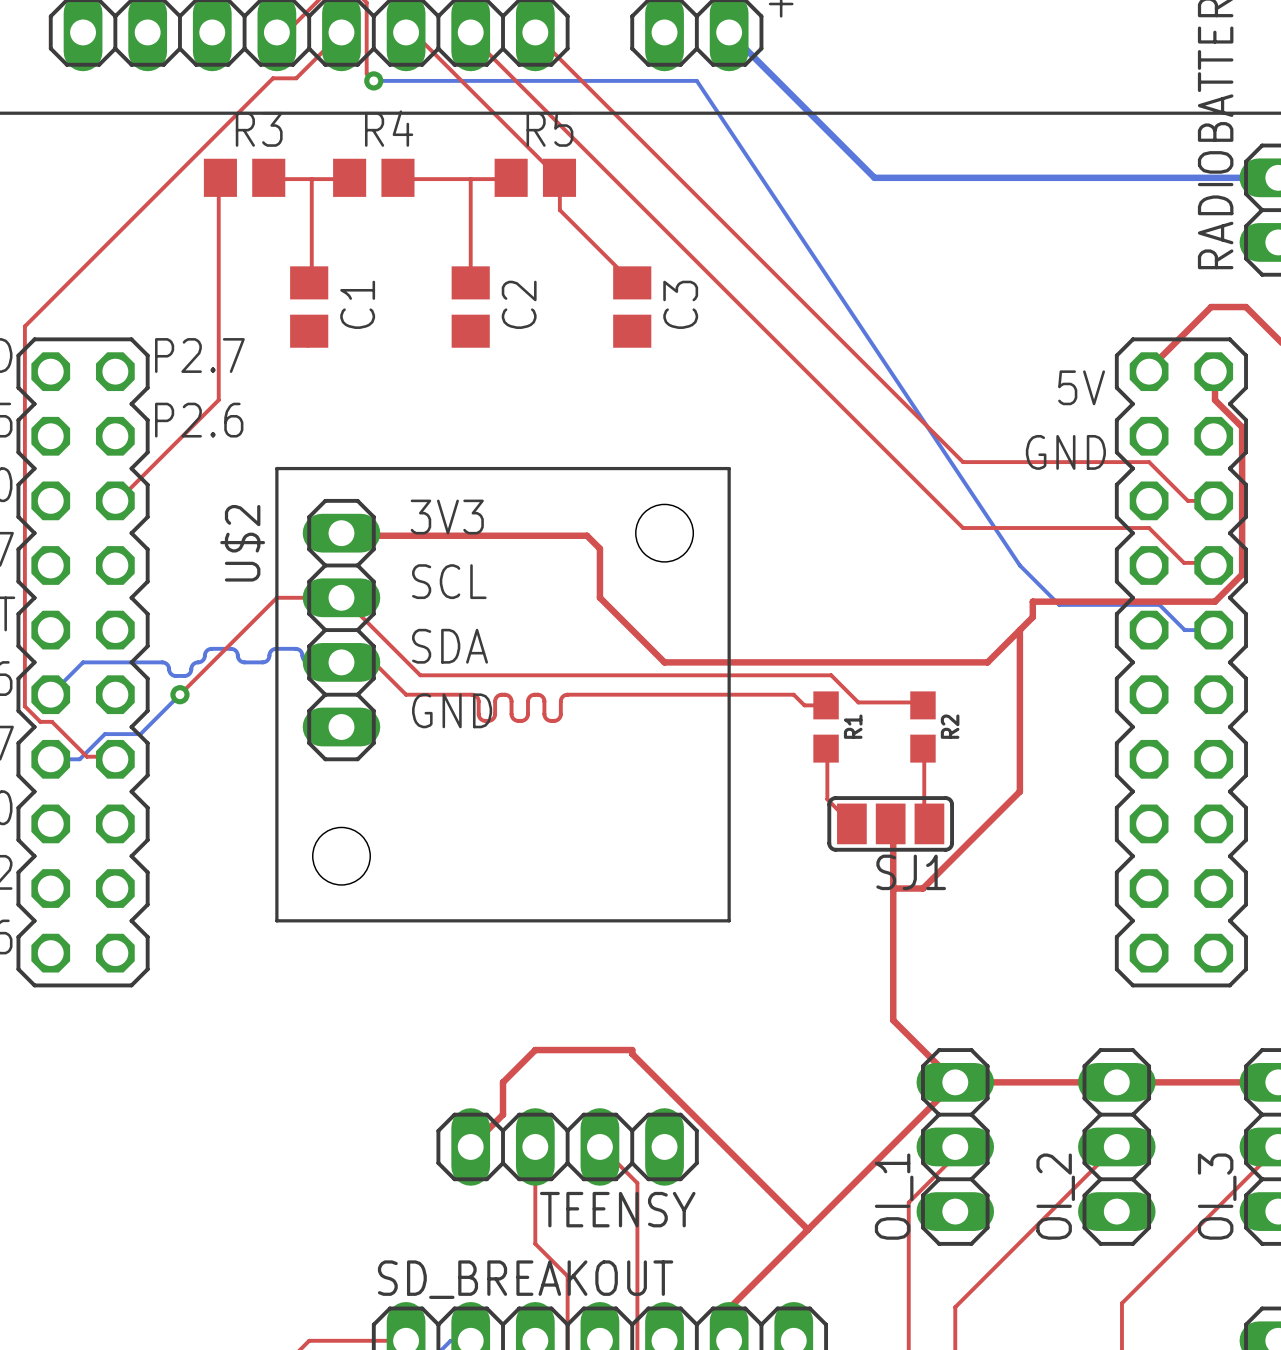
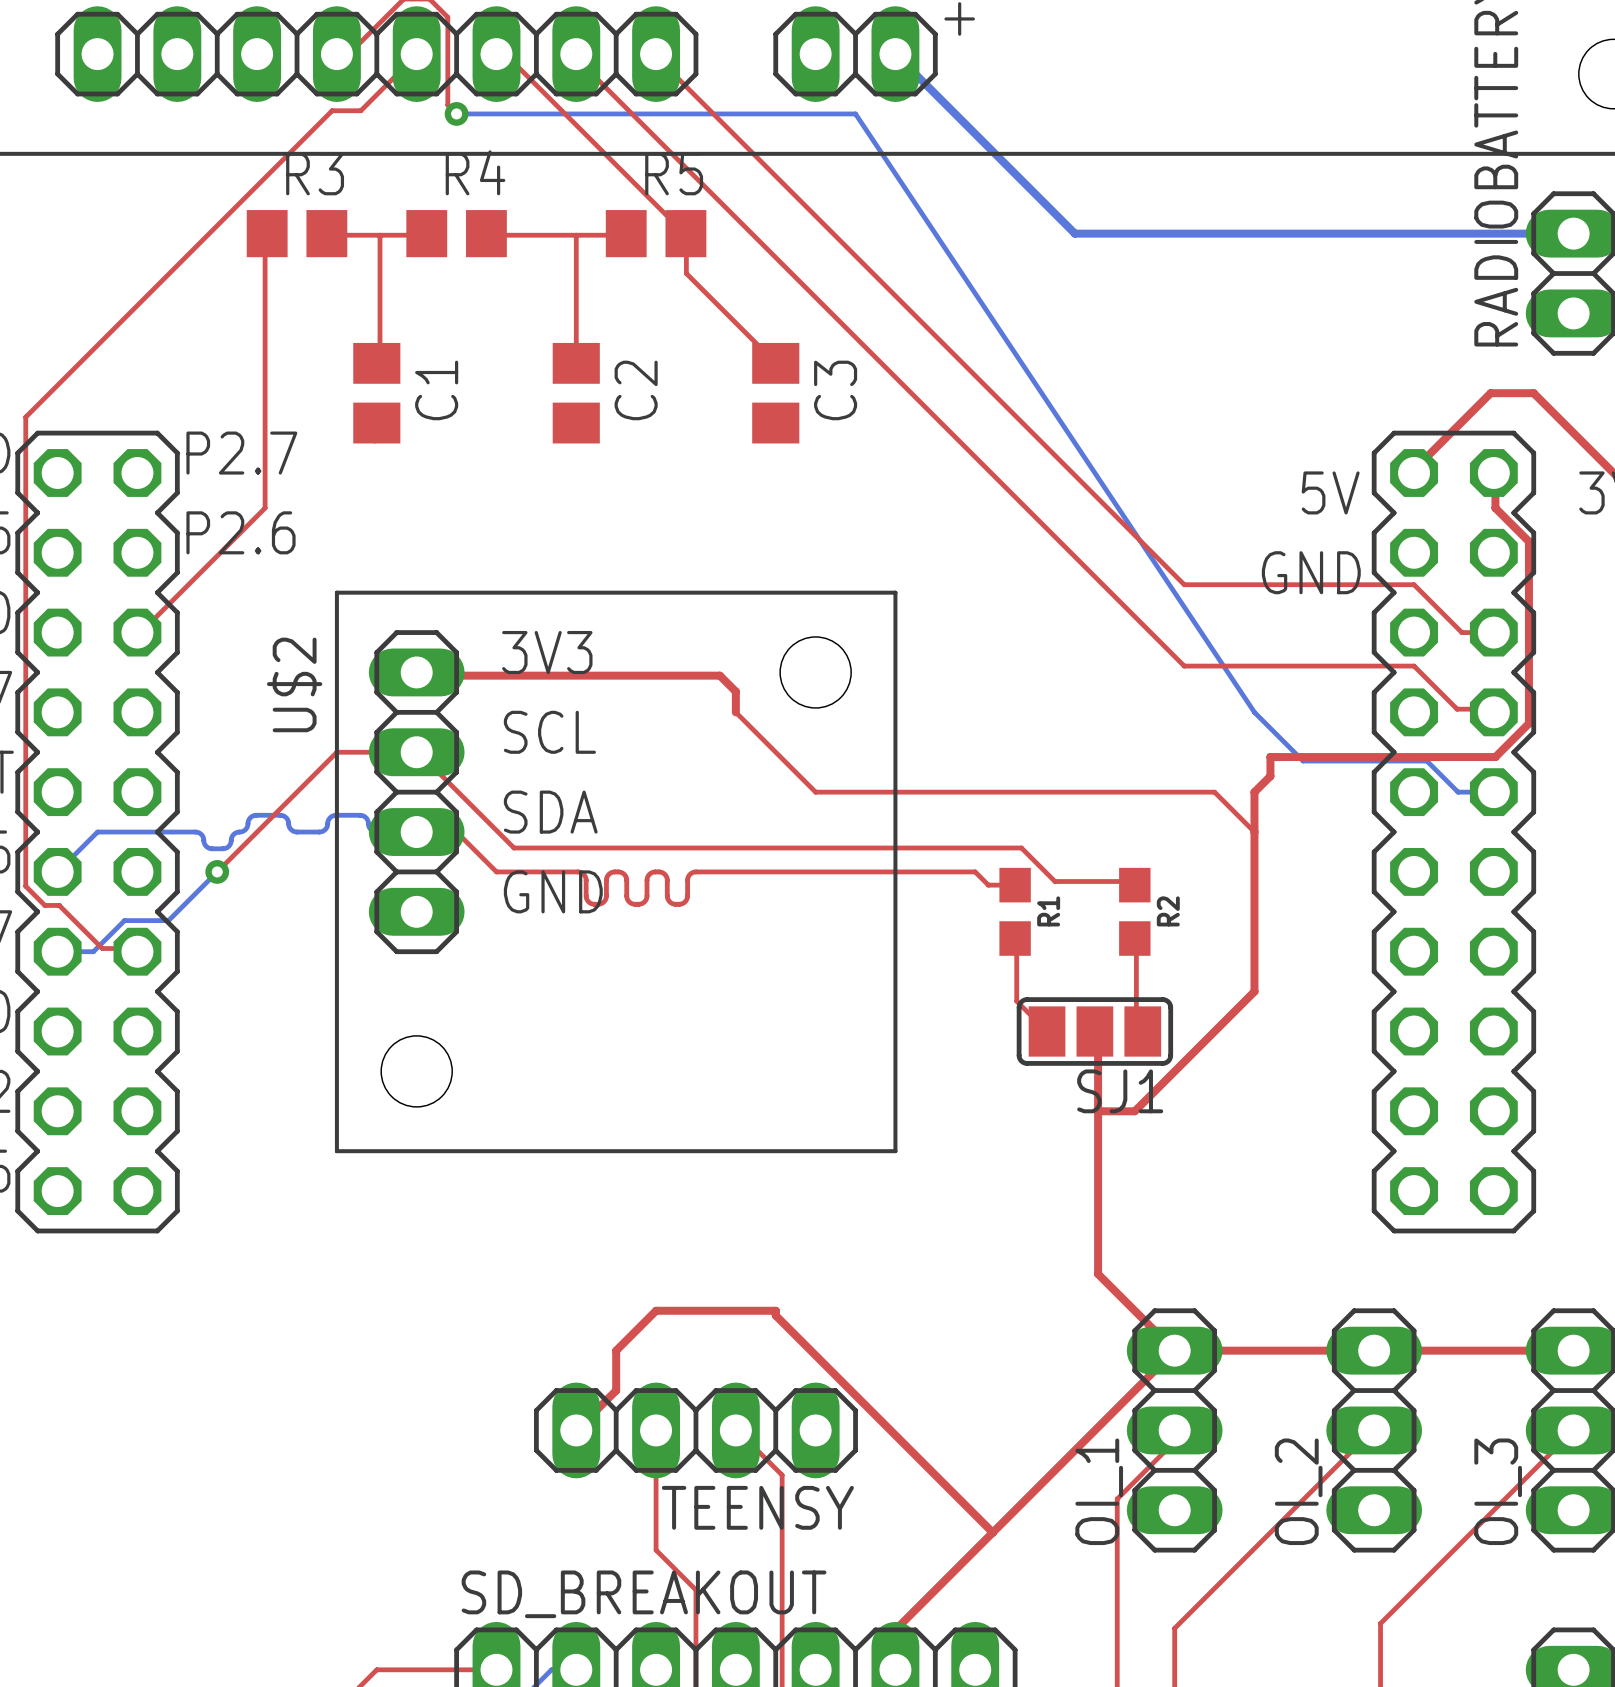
top track: (599, 565) (599, 597) (664, 662) (987, 662) (1019, 630) -> (735, 712) (815, 792) (1214, 792) (1254, 832)

